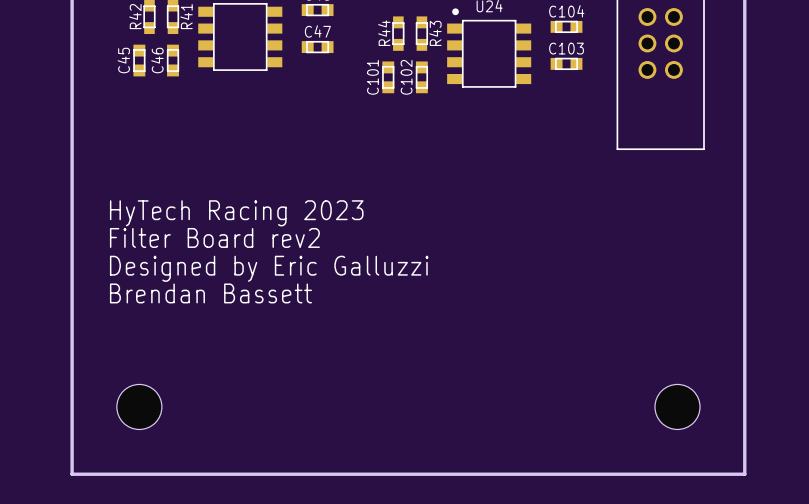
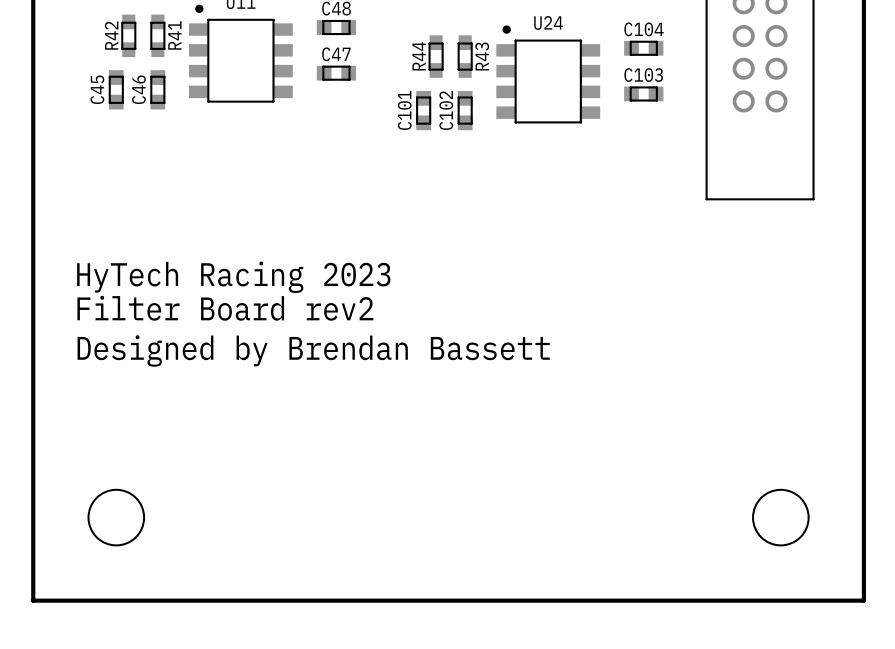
text: Designed by Eric Galluzzi (269, 268) -> Designed by Brendan Bassett (313, 351)
text: Brendan Bassett (210, 293) -> none

